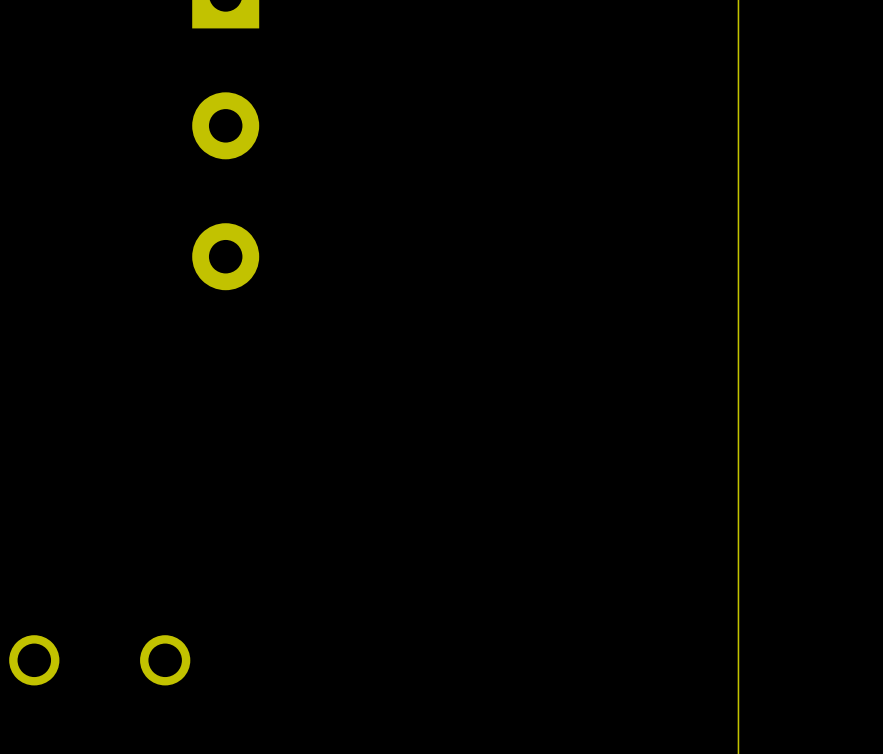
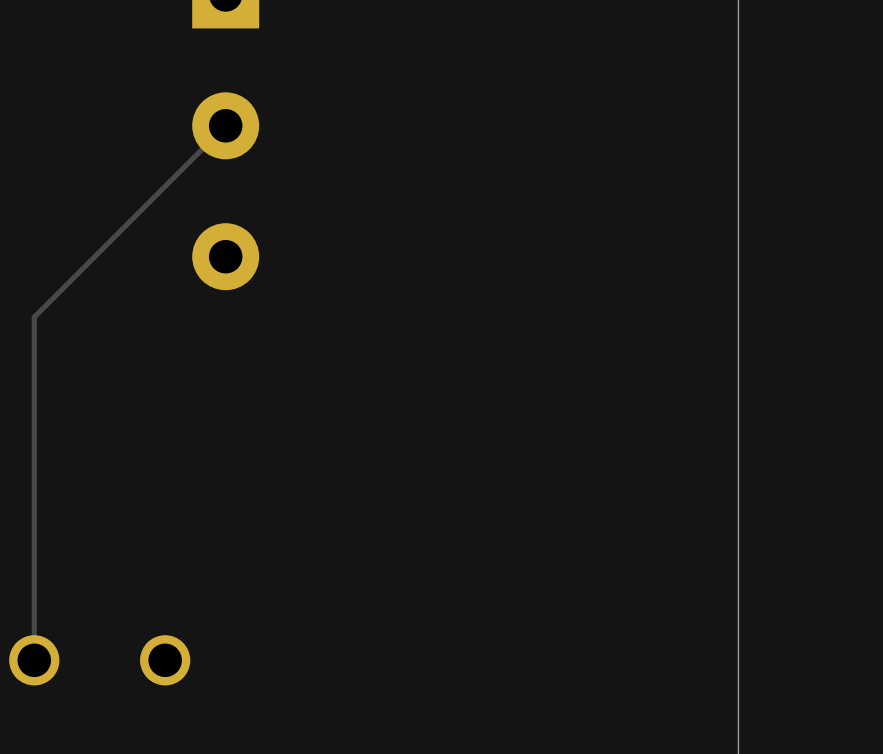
track: none -> (225, 125) (34, 317) (34, 660)

